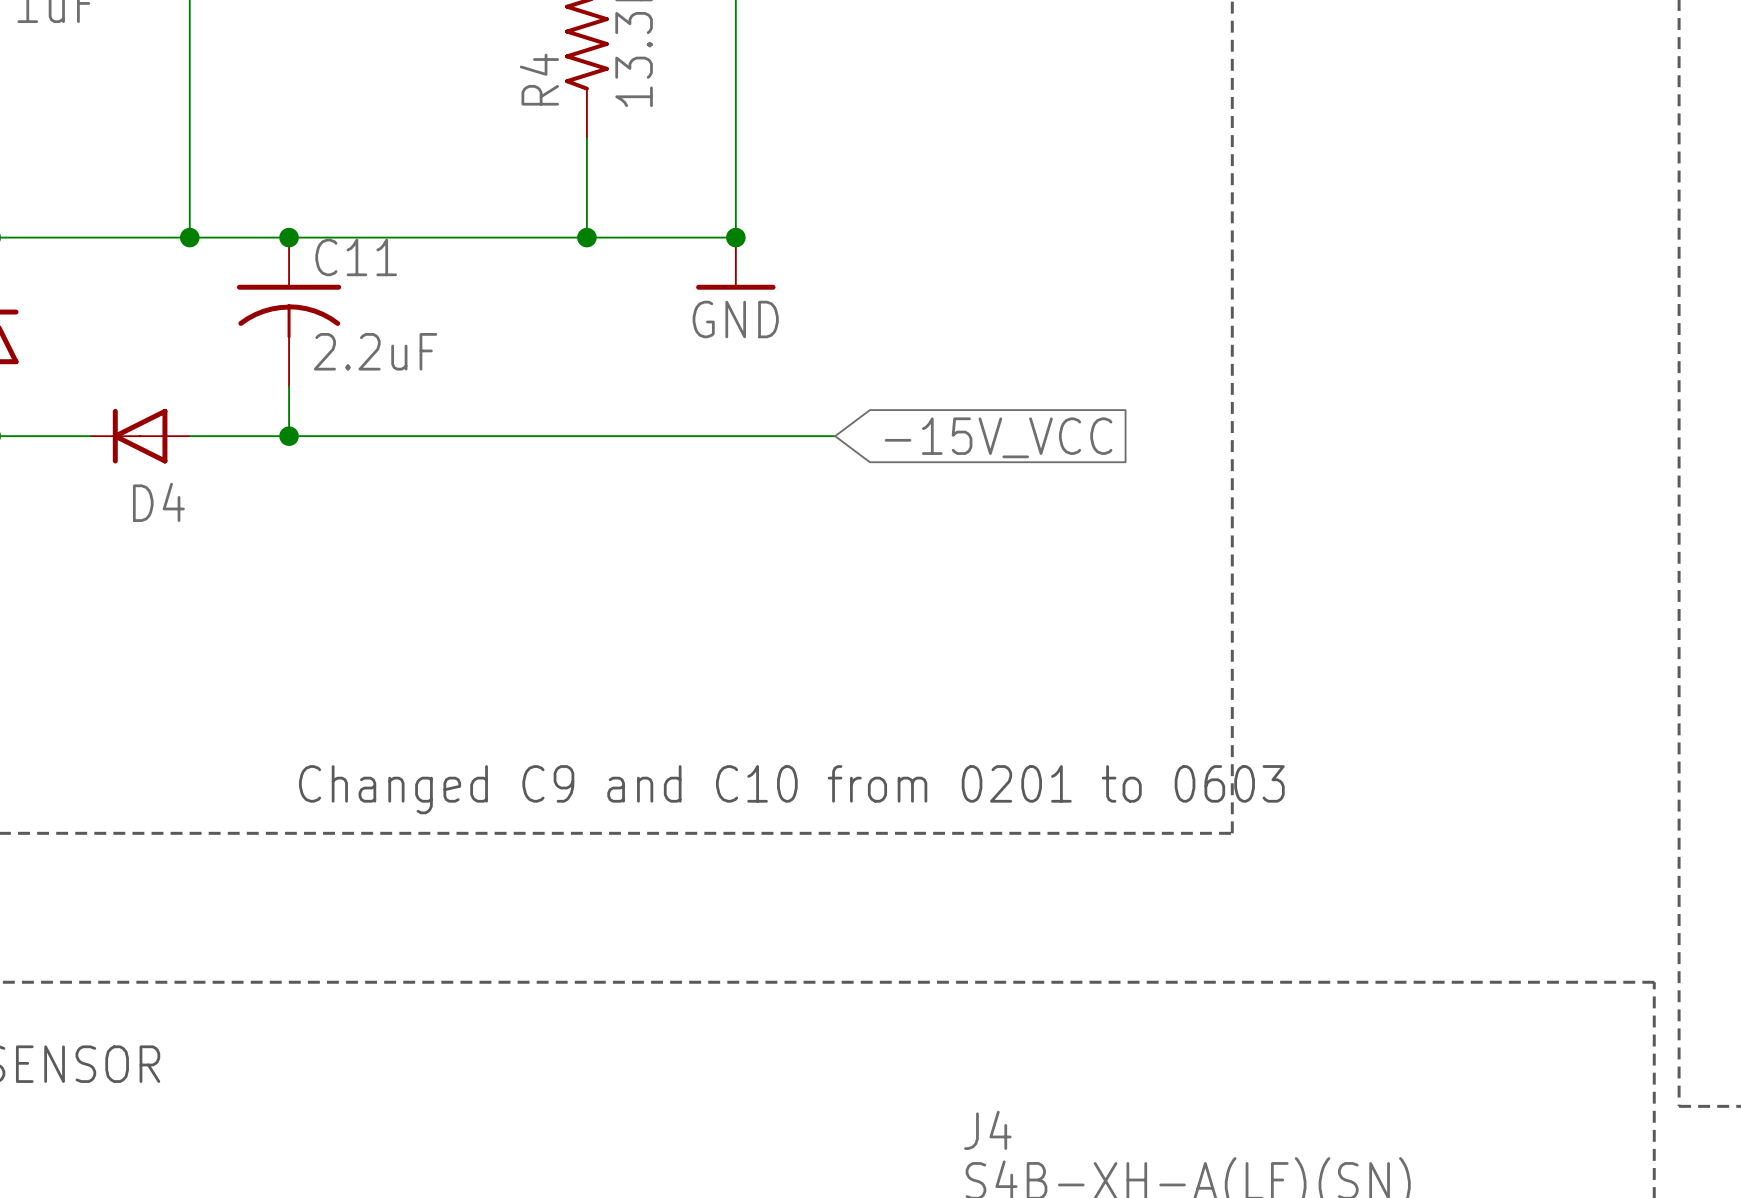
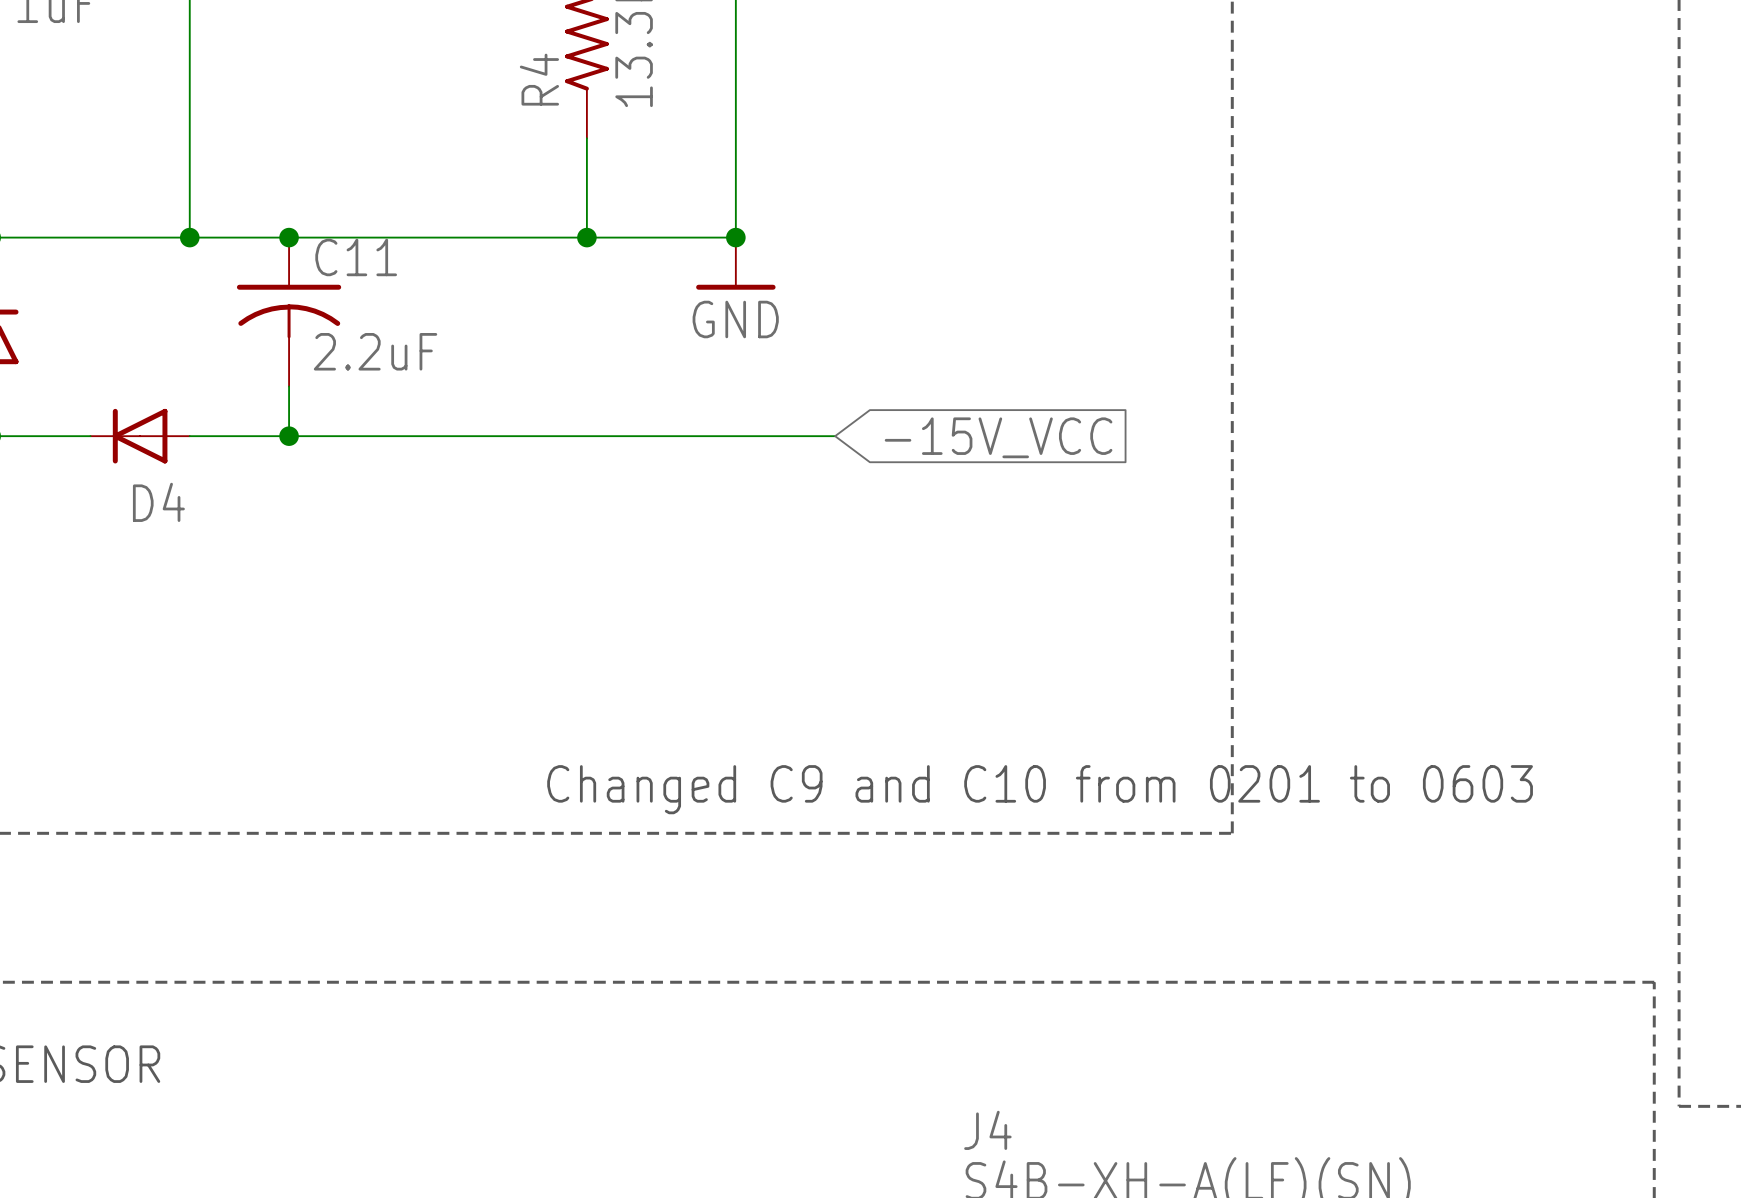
text position: Changed C9 and C10 from 0201 to 0603 (791, 789) -> Changed C9 and C10 from 0201 to 0603 (1040, 789)

